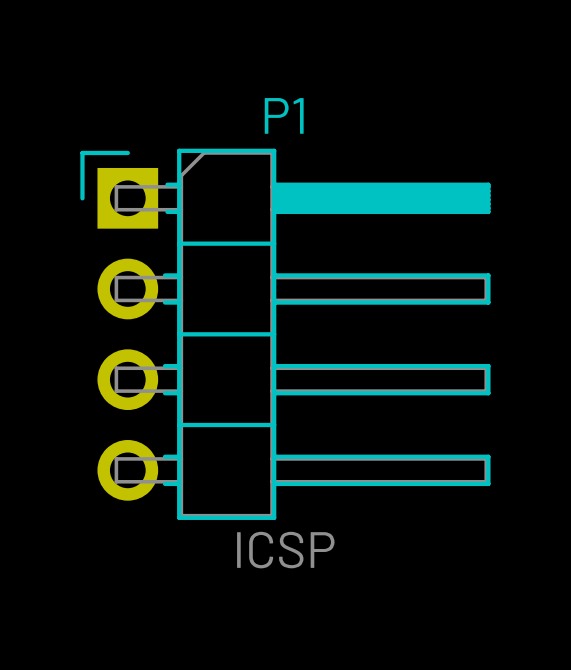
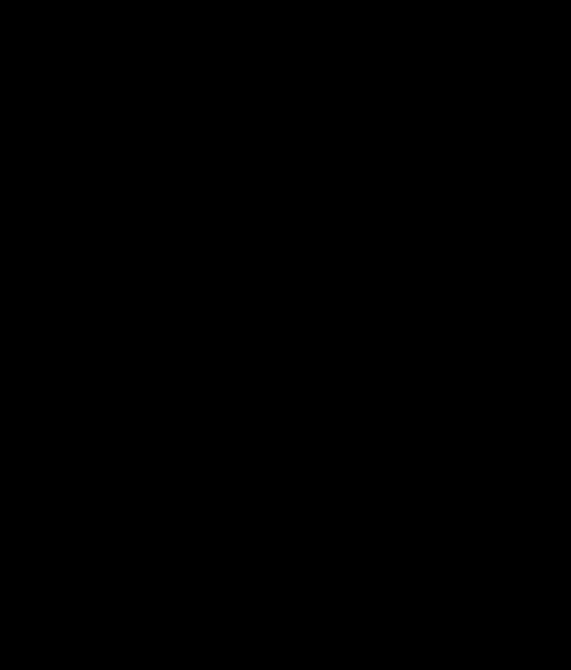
P1: ICSP (285, 334) -> none

